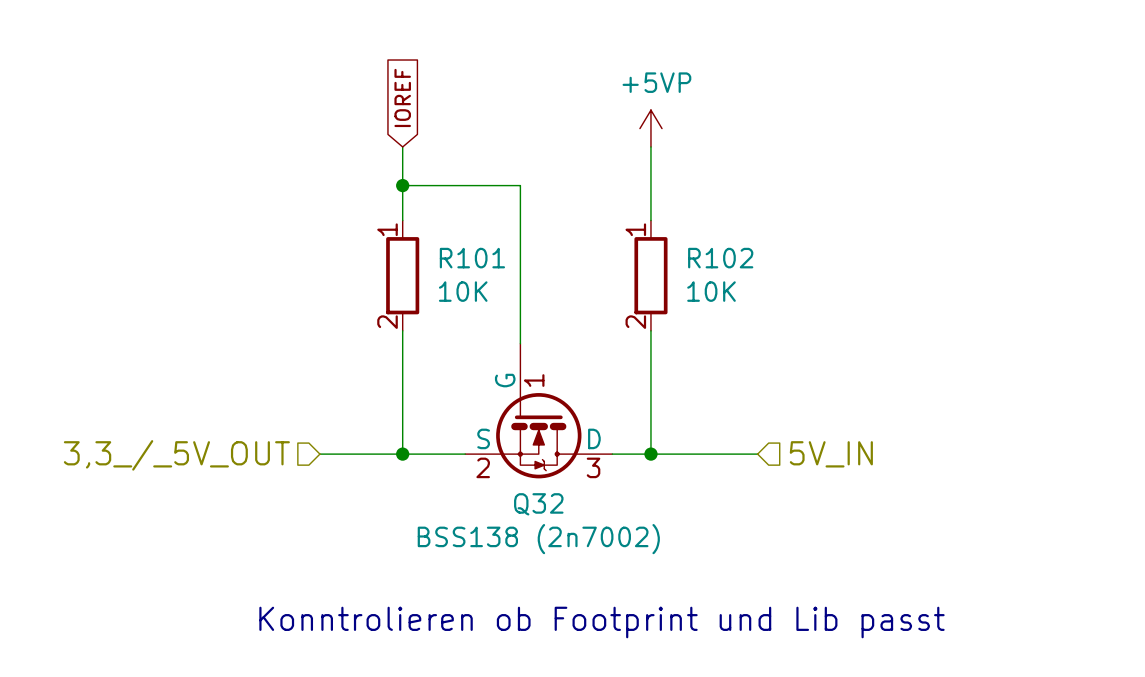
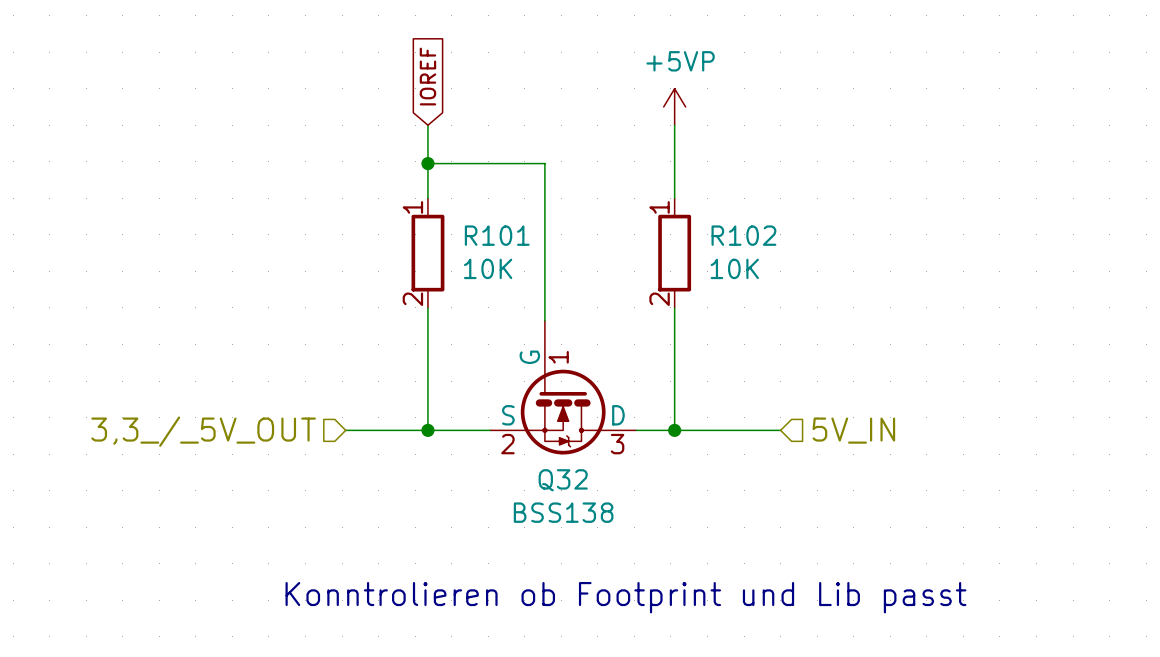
Q32 value: BSS138 (2n7002) (538, 539) -> BSS138 (563, 512)

